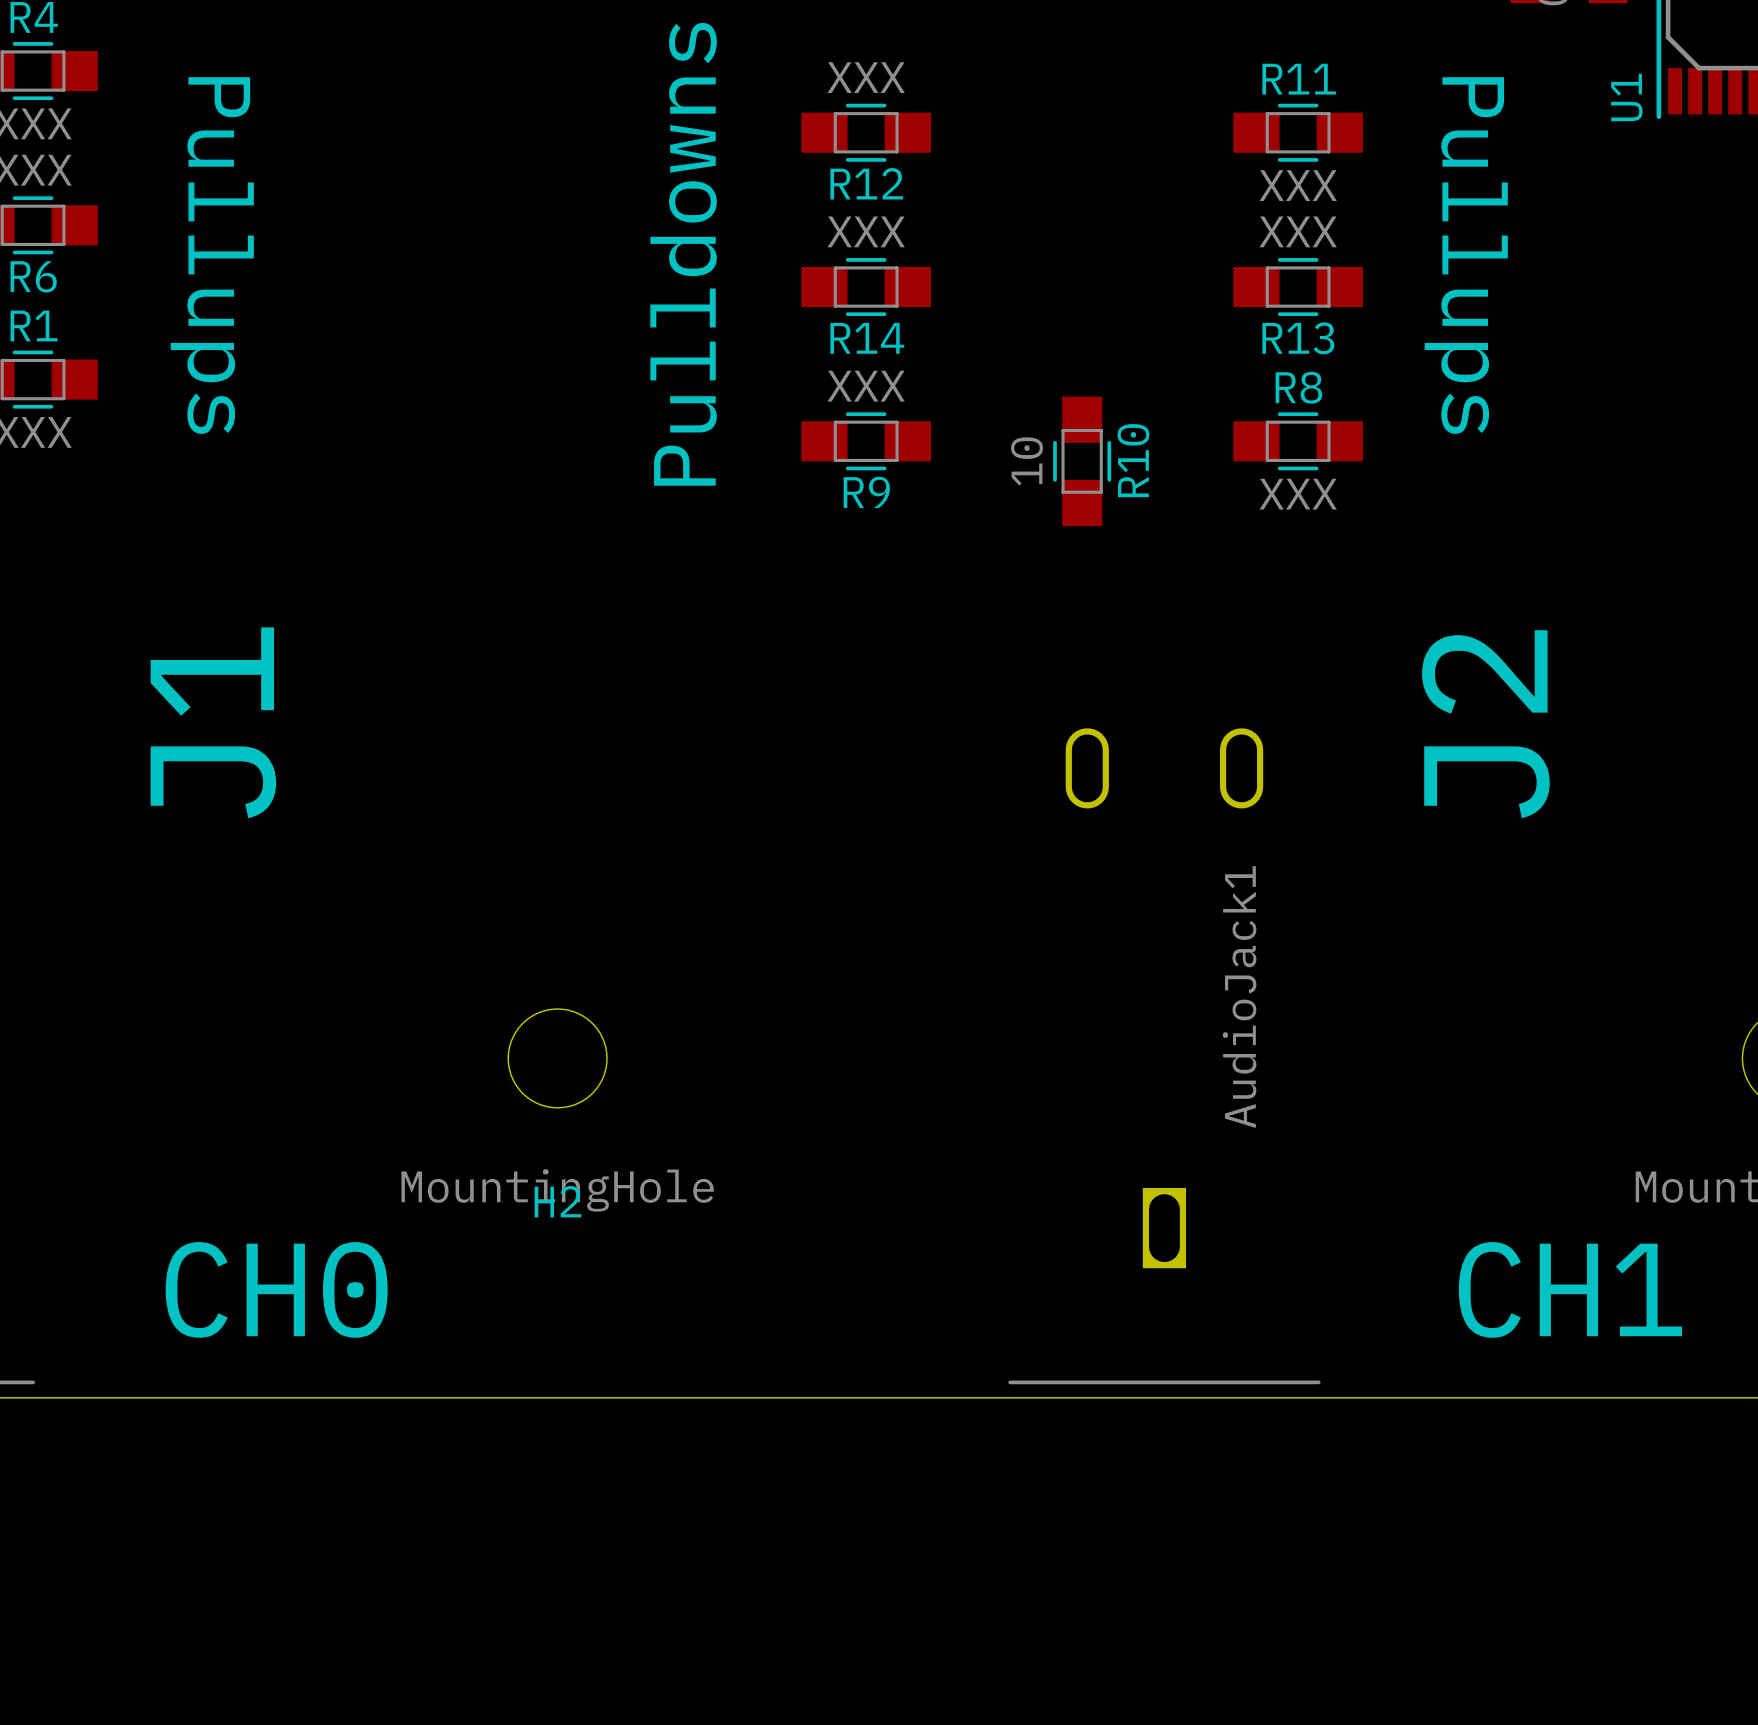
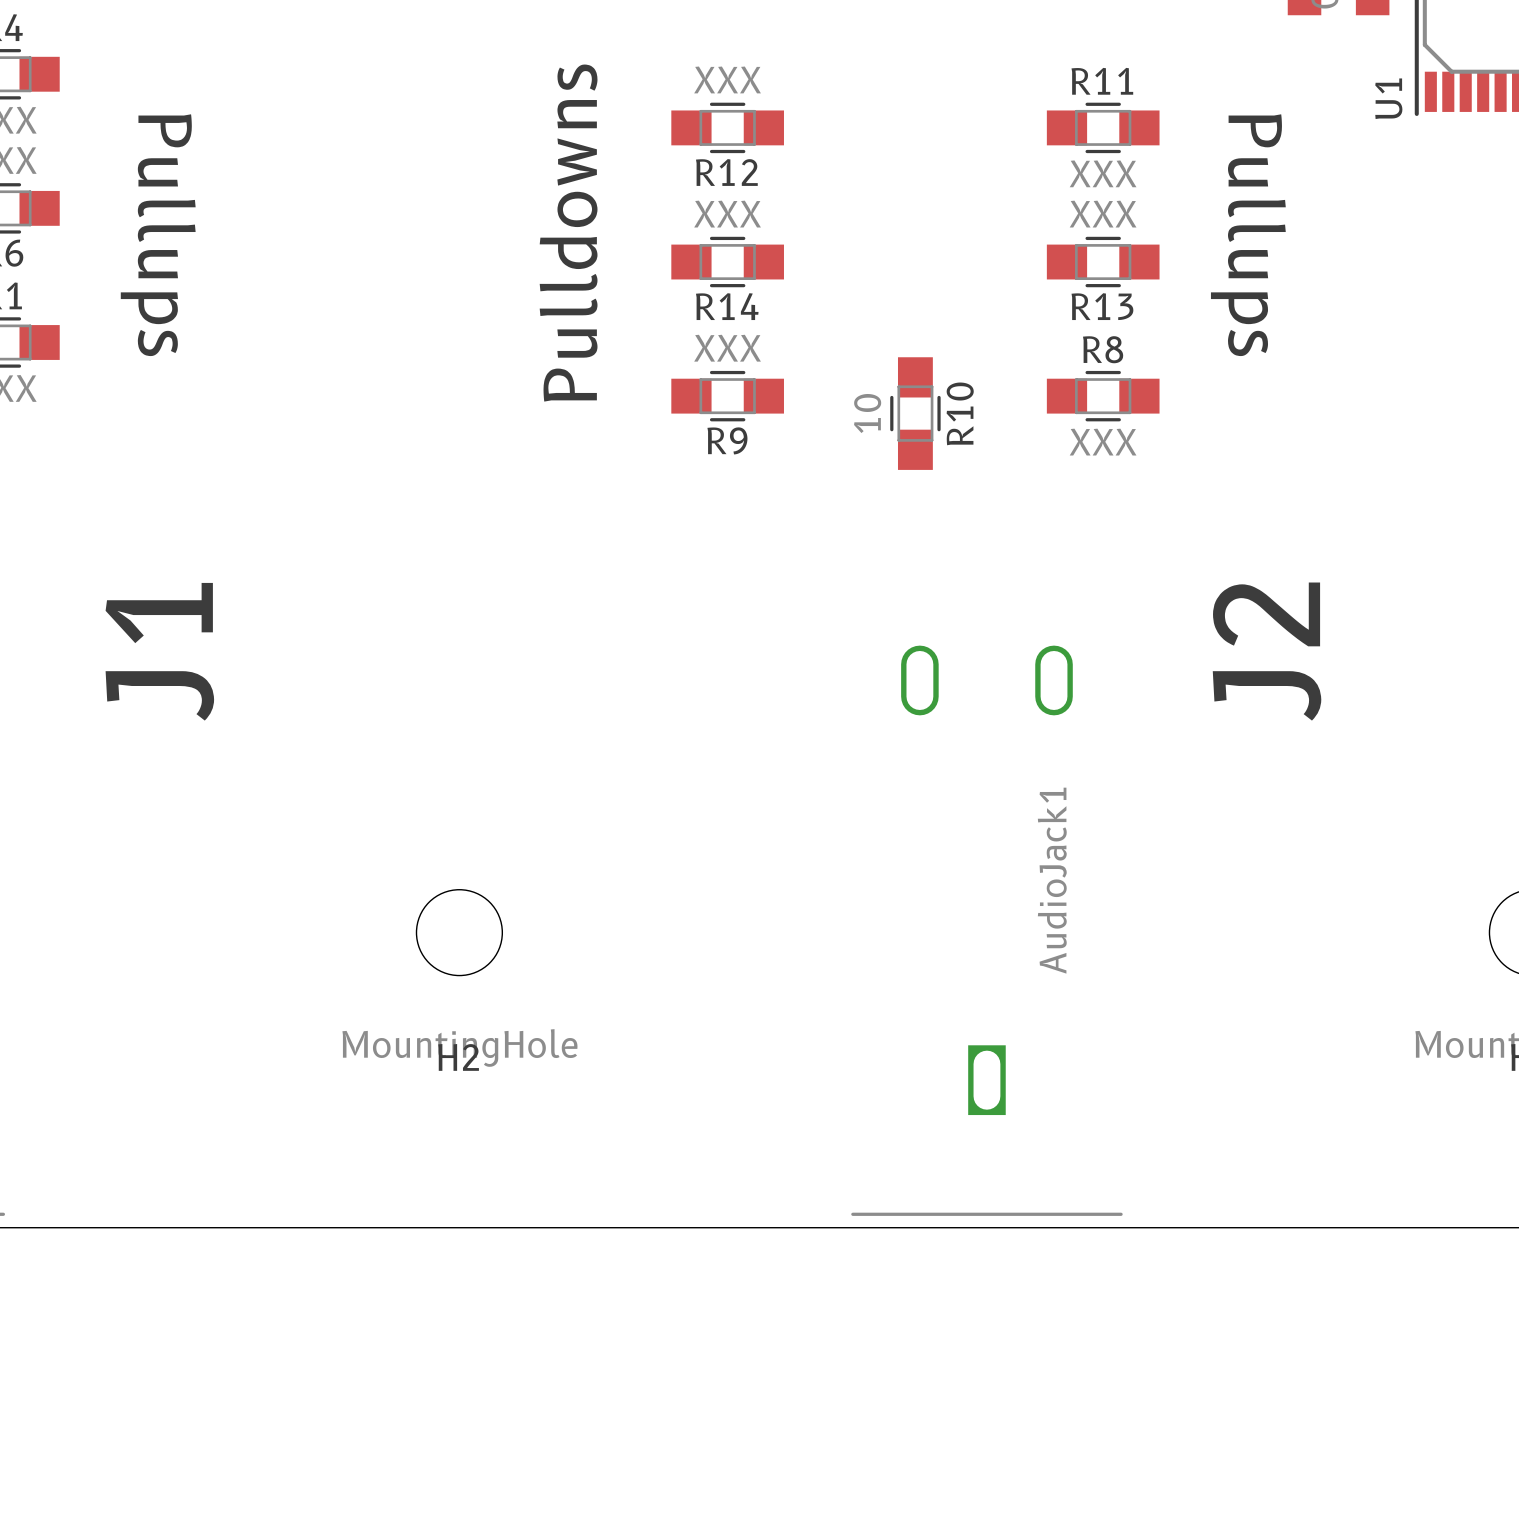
text: CH0 (276, 1289) -> none
text: CH1 (1570, 1289) -> none

